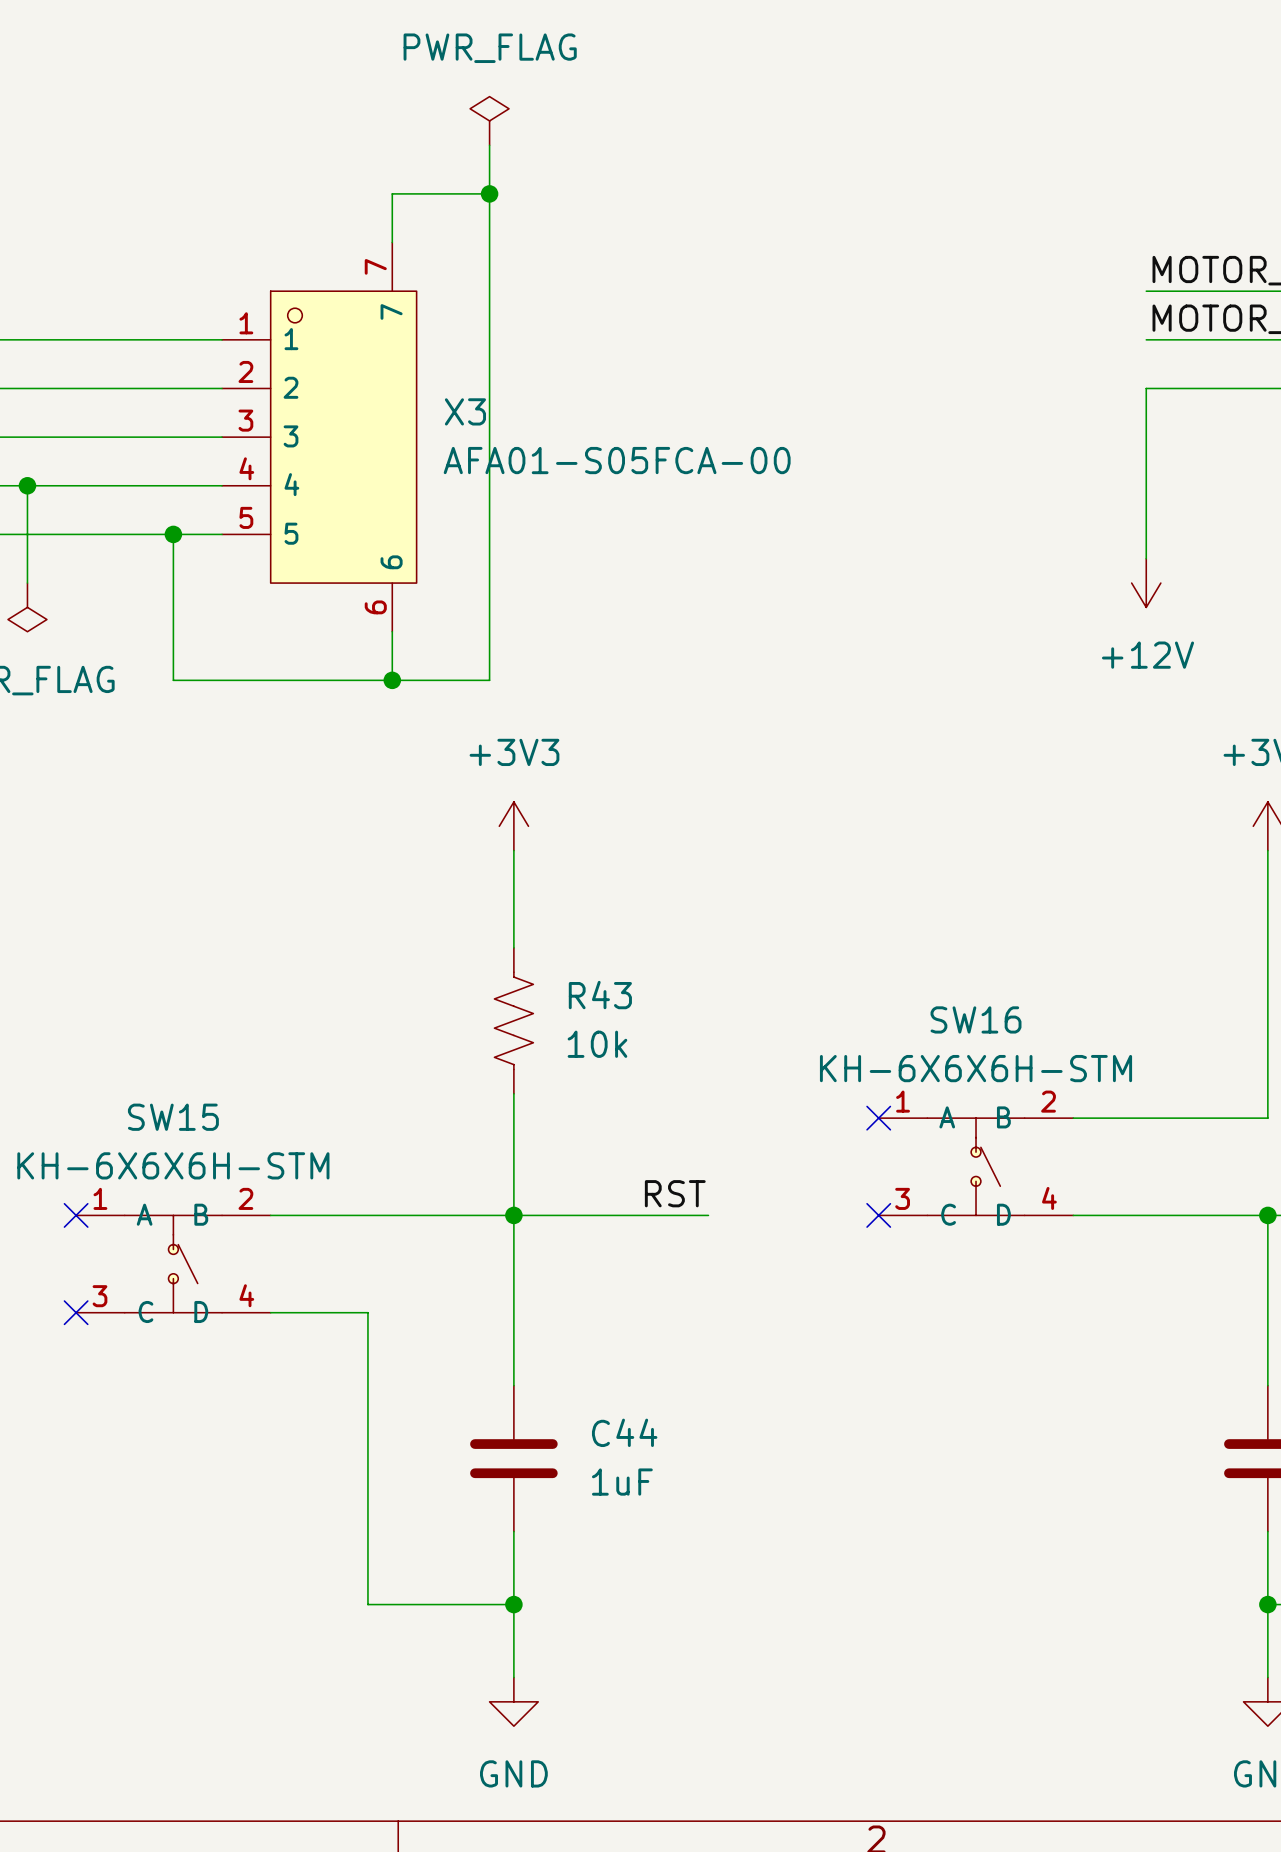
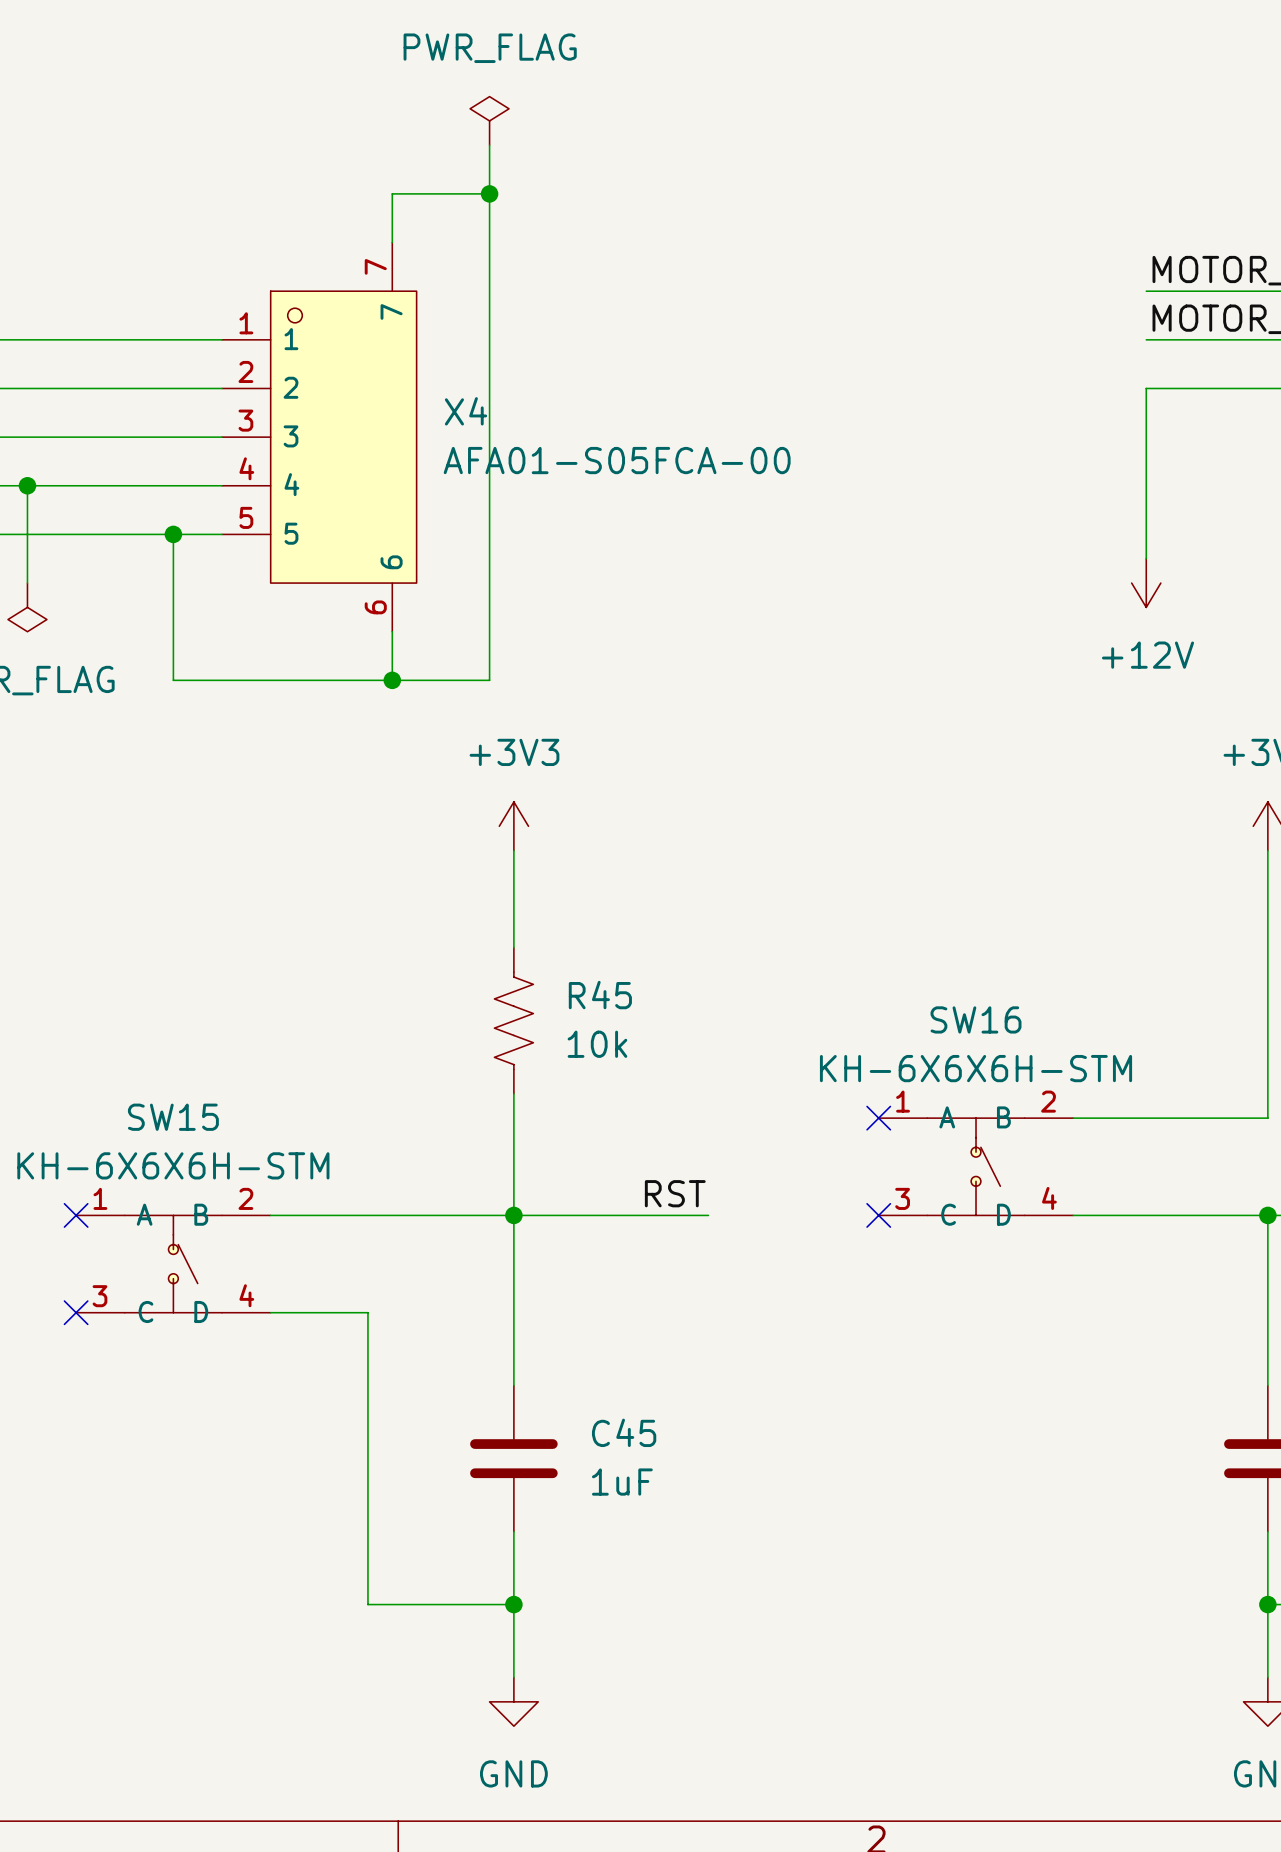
X3 name: X3 (465, 411) -> X4 (466, 411)
R43 name: R43 (600, 995) -> R45 (600, 995)
C44 name: C44 (624, 1432) -> C45 (624, 1432)

